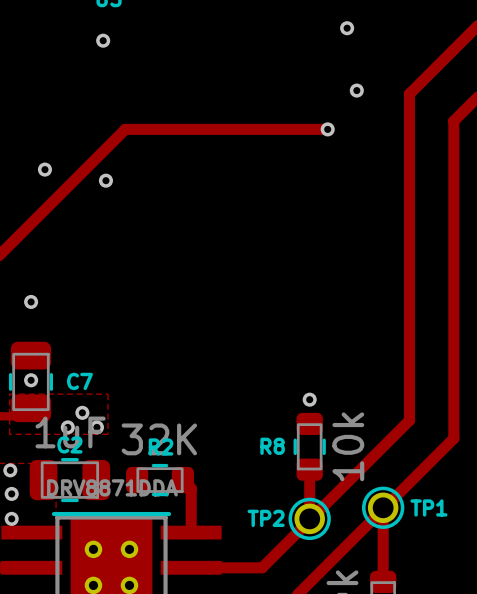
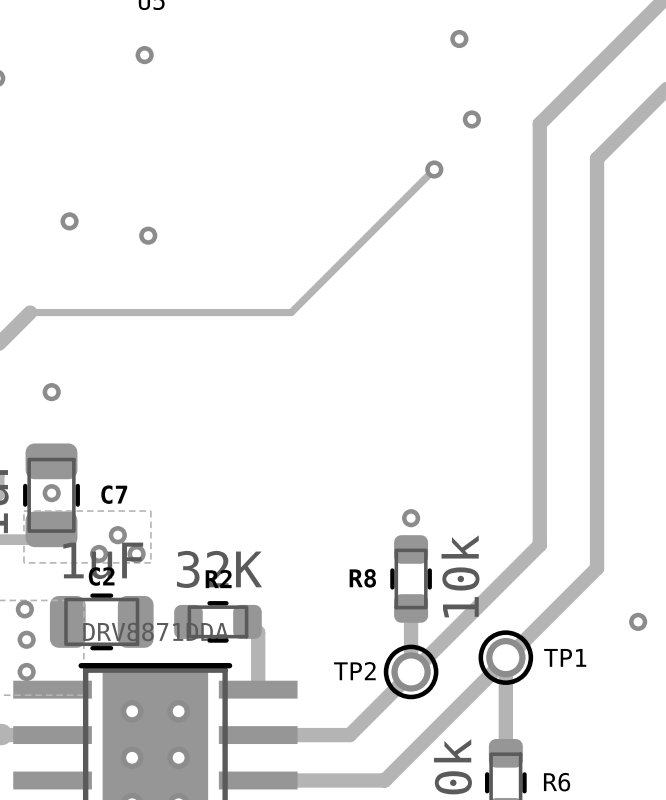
track: (327, 129) (125, 129) (15, 238) -> (434, 169) (291, 312) (32, 312)

